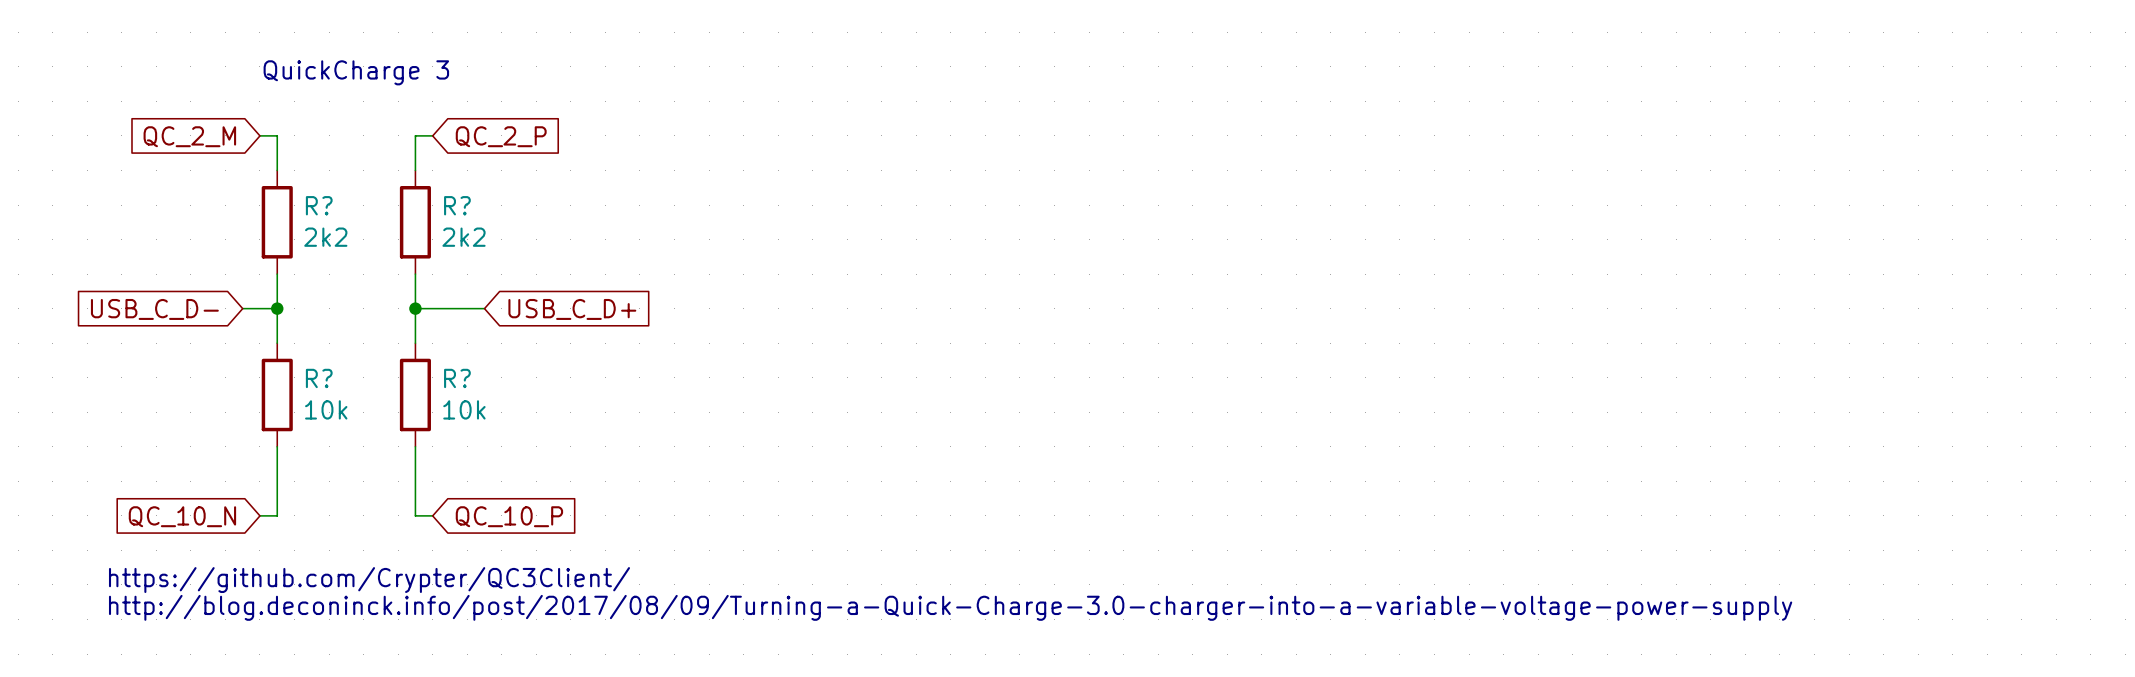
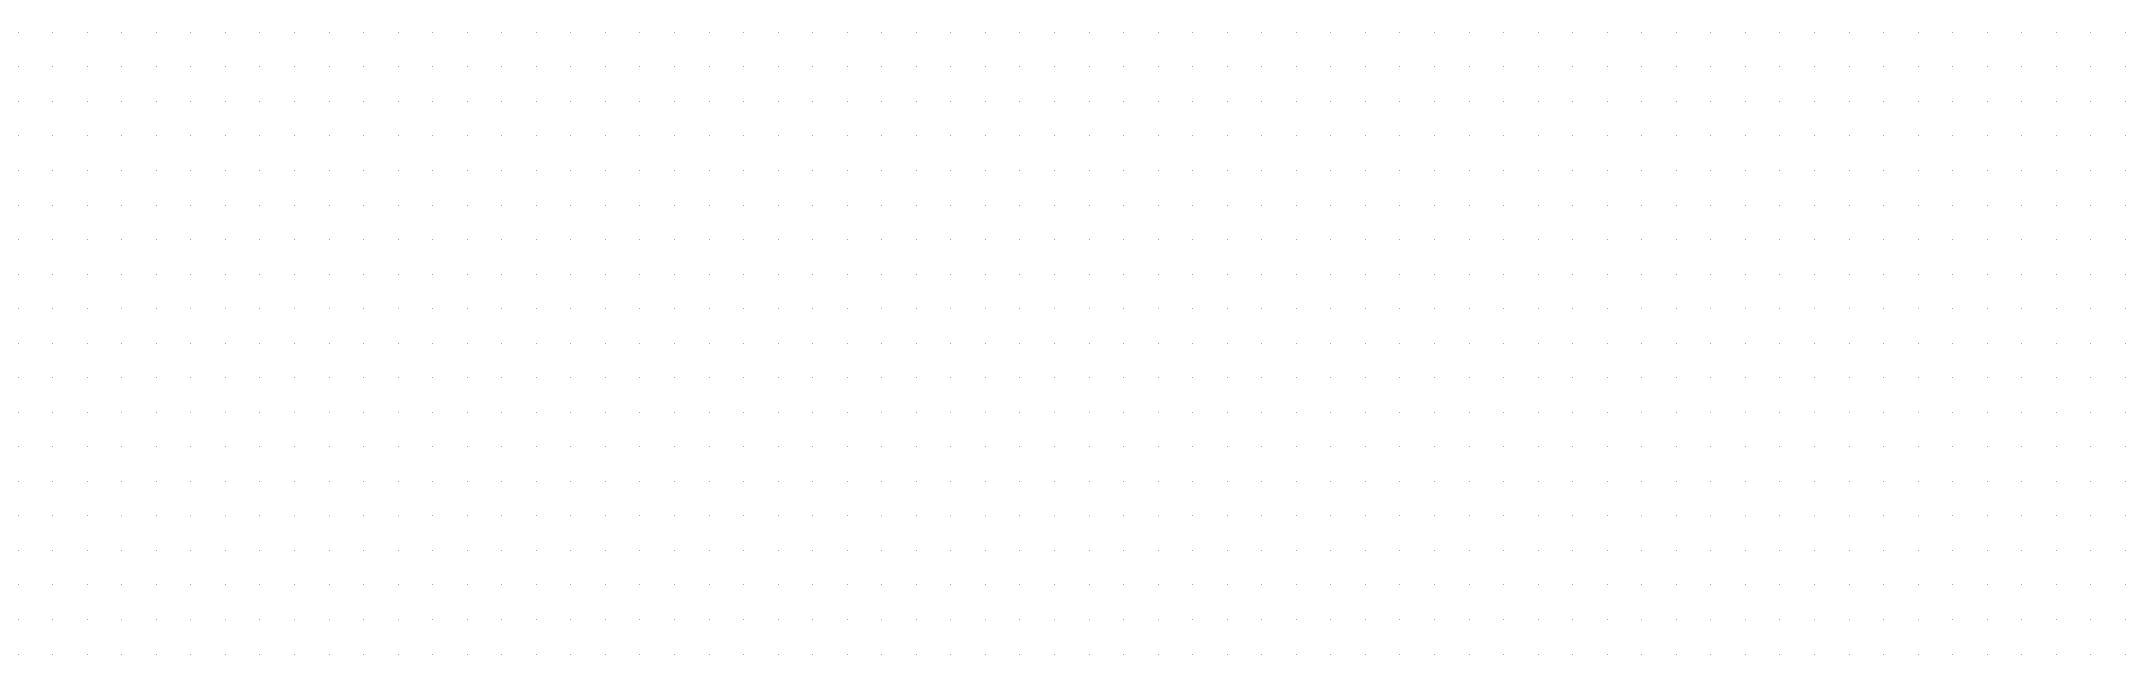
text: QuickCharge 3 (356, 72) -> none
wire: (259, 135) (277, 135) (277, 170) -> none
wire: (432, 135) (415, 135) (415, 170) -> none
global label: QC_2_M (189, 136) -> none
global label: QC_2_P (501, 136) -> none
R?: 2k2 (277, 222) -> none
R?: 2k2 (415, 222) -> none
wire: (277, 274) (277, 343) -> none
wire: (415, 274) (415, 343) -> none
wire: (242, 308) (277, 308) -> none
junction: (277, 308) -> none
wire: (415, 308) (484, 308) -> none
junction: (415, 308) -> none
global label: USB_C_D- (154, 309) -> none
global label: USB_C_D+ (572, 309) -> none
R?: 10k (277, 394) -> none
R?: 10k (415, 394) -> none
wire: (277, 446) (277, 515) (259, 515) -> none
wire: (415, 446) (415, 515) (432, 515) -> none
global label: QC_10_N (182, 516) -> none
global label: QC_10_P (509, 516) -> none
text: https://github.com/Crypter/QC3Client/ (369, 580) -> none
text: http://blog.deconinck.info/post/2017/08/09/Turning-a-Quick-Charge-3.0-charger-into-a-variable-voltage-power-supply (950, 607) -> none

